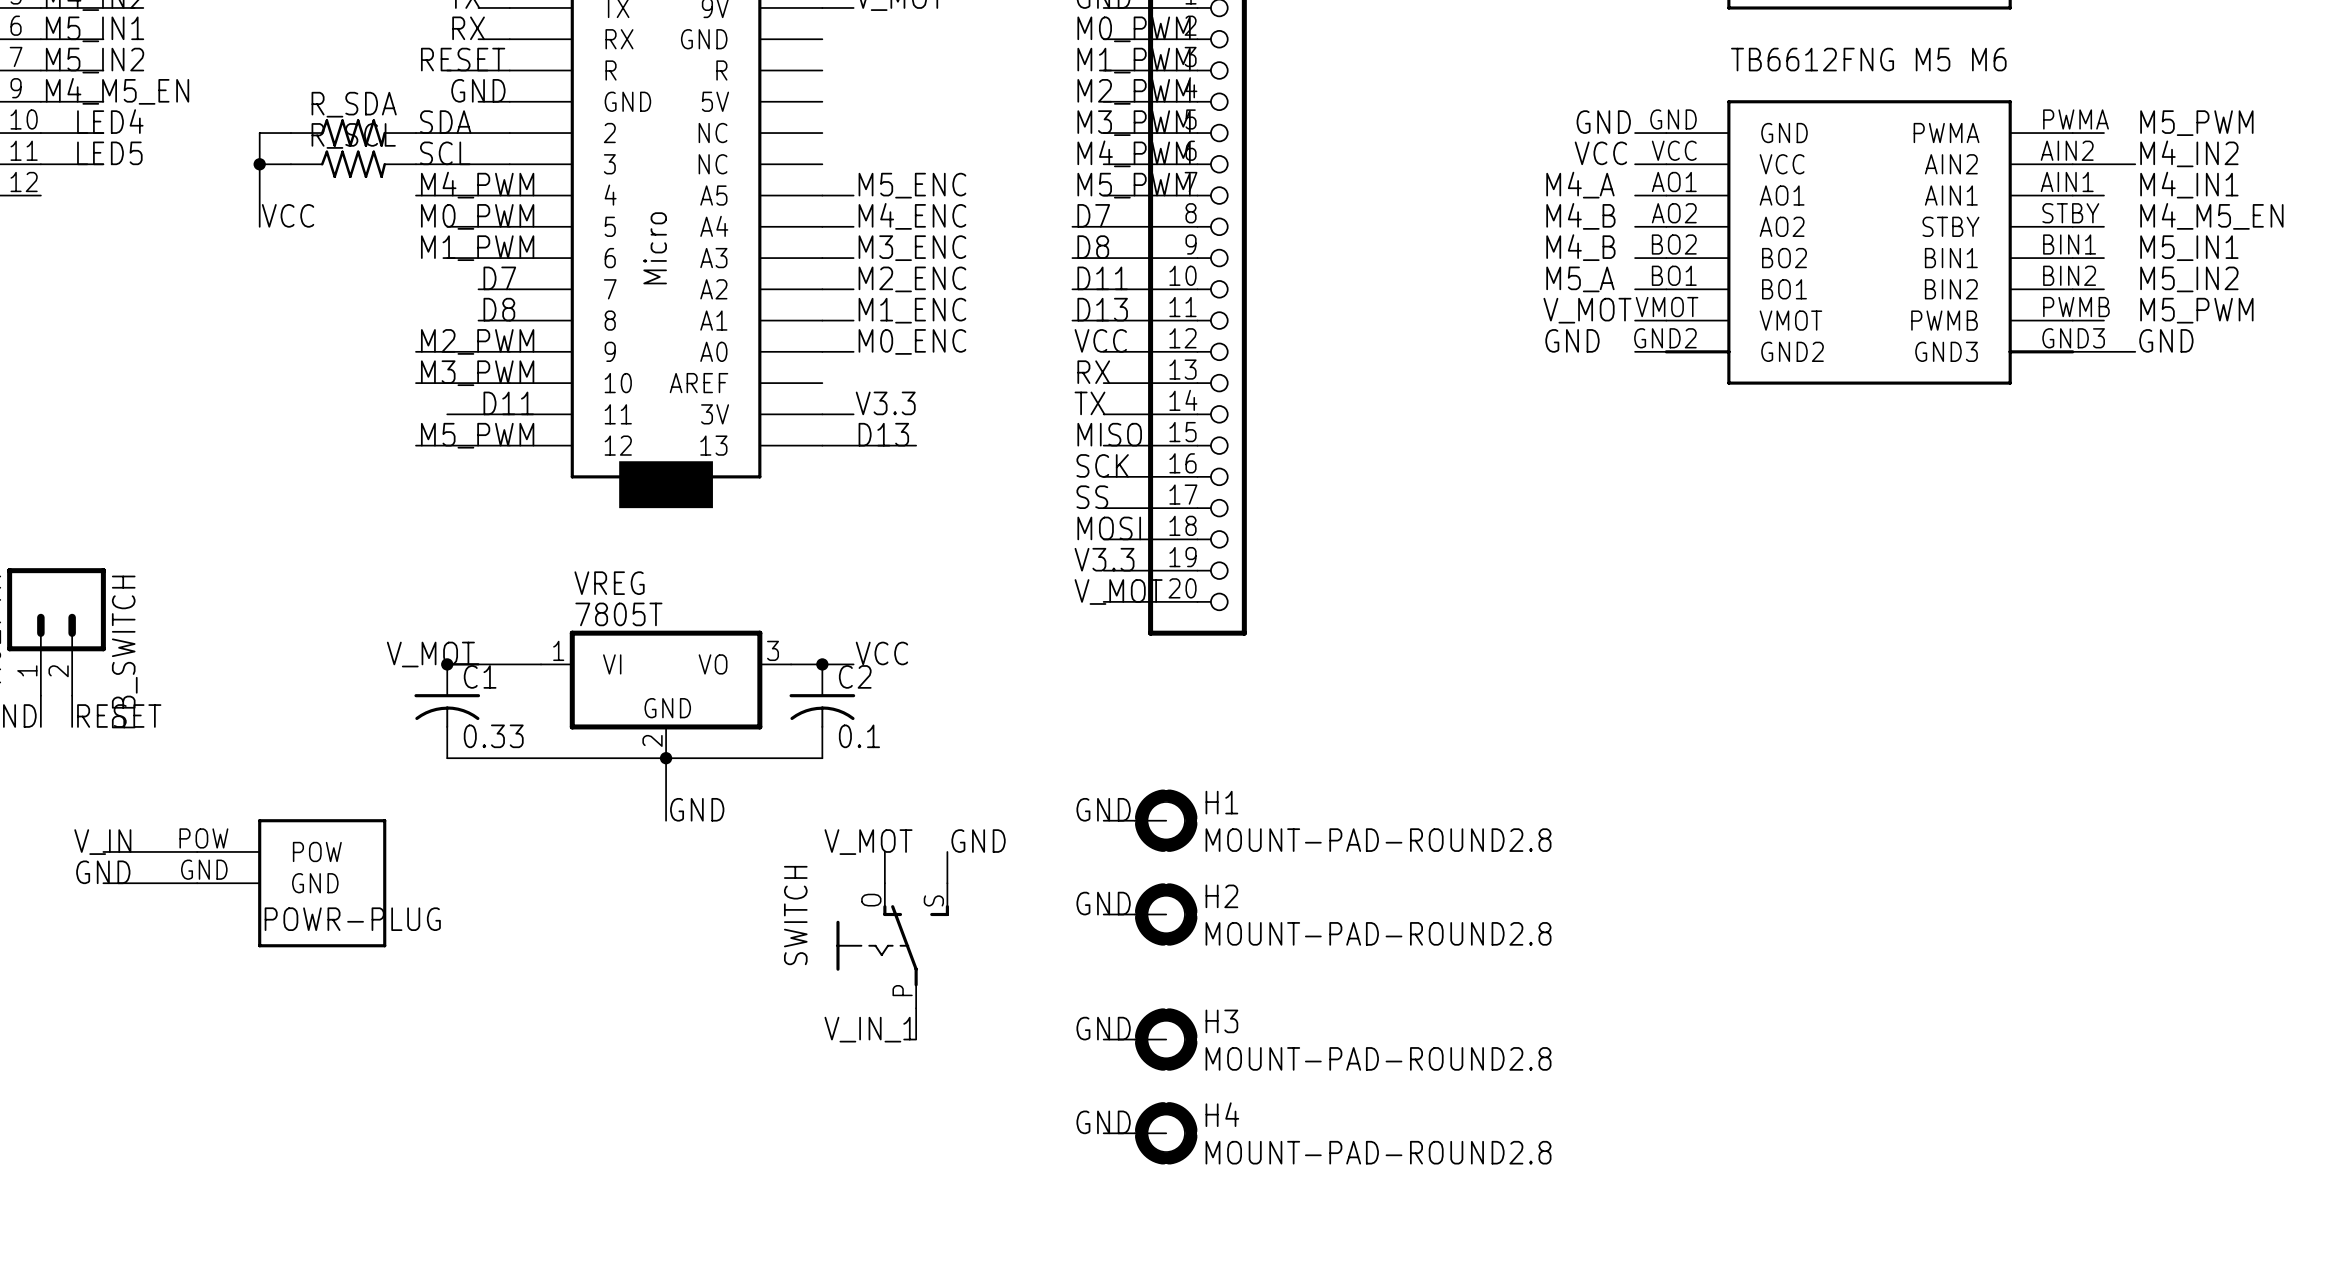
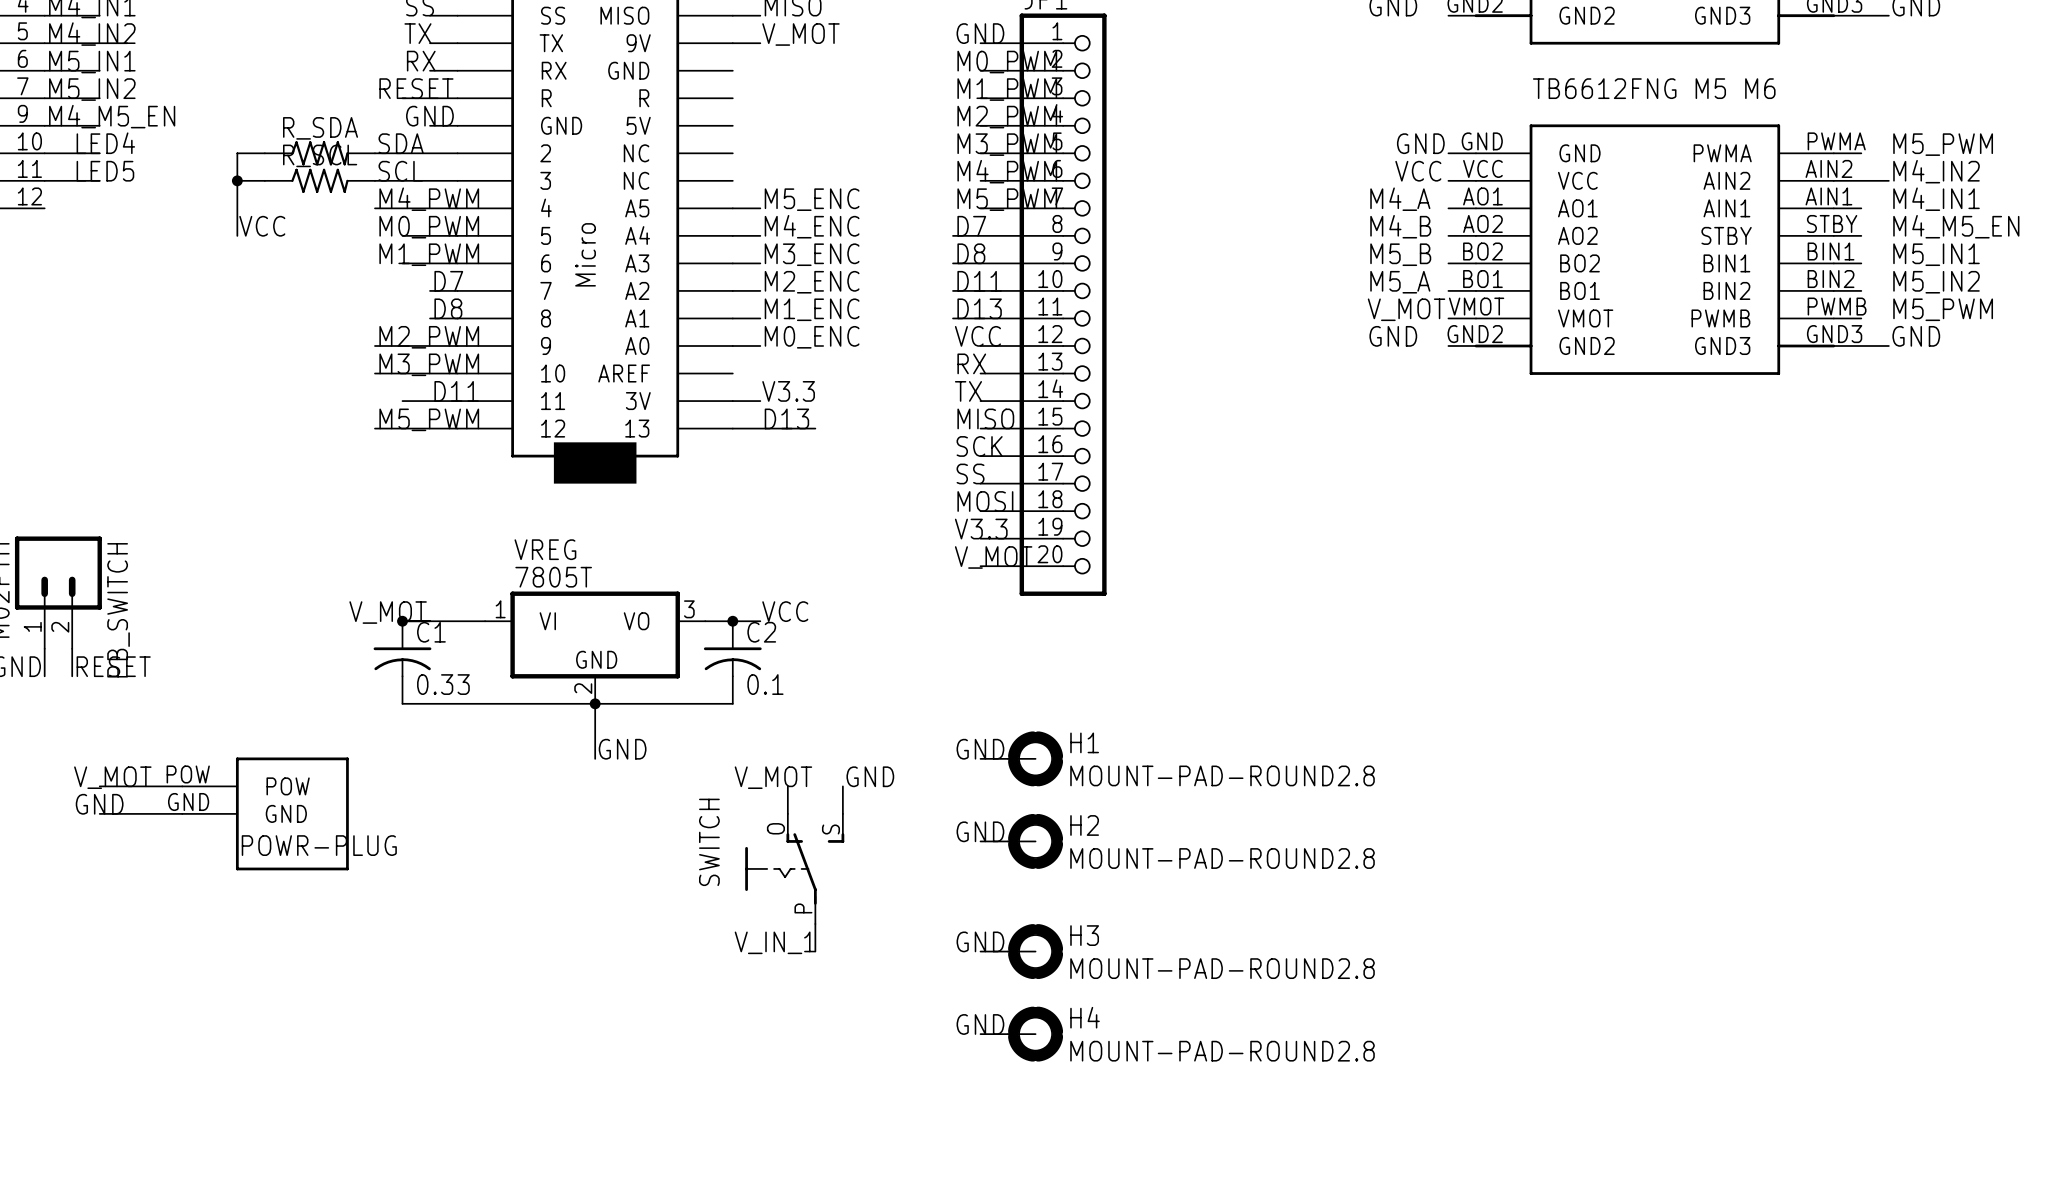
label: M4_B (1580, 247) -> M5_B (1400, 254)
label: V_IN (102, 842) -> V_MOT (112, 777)

